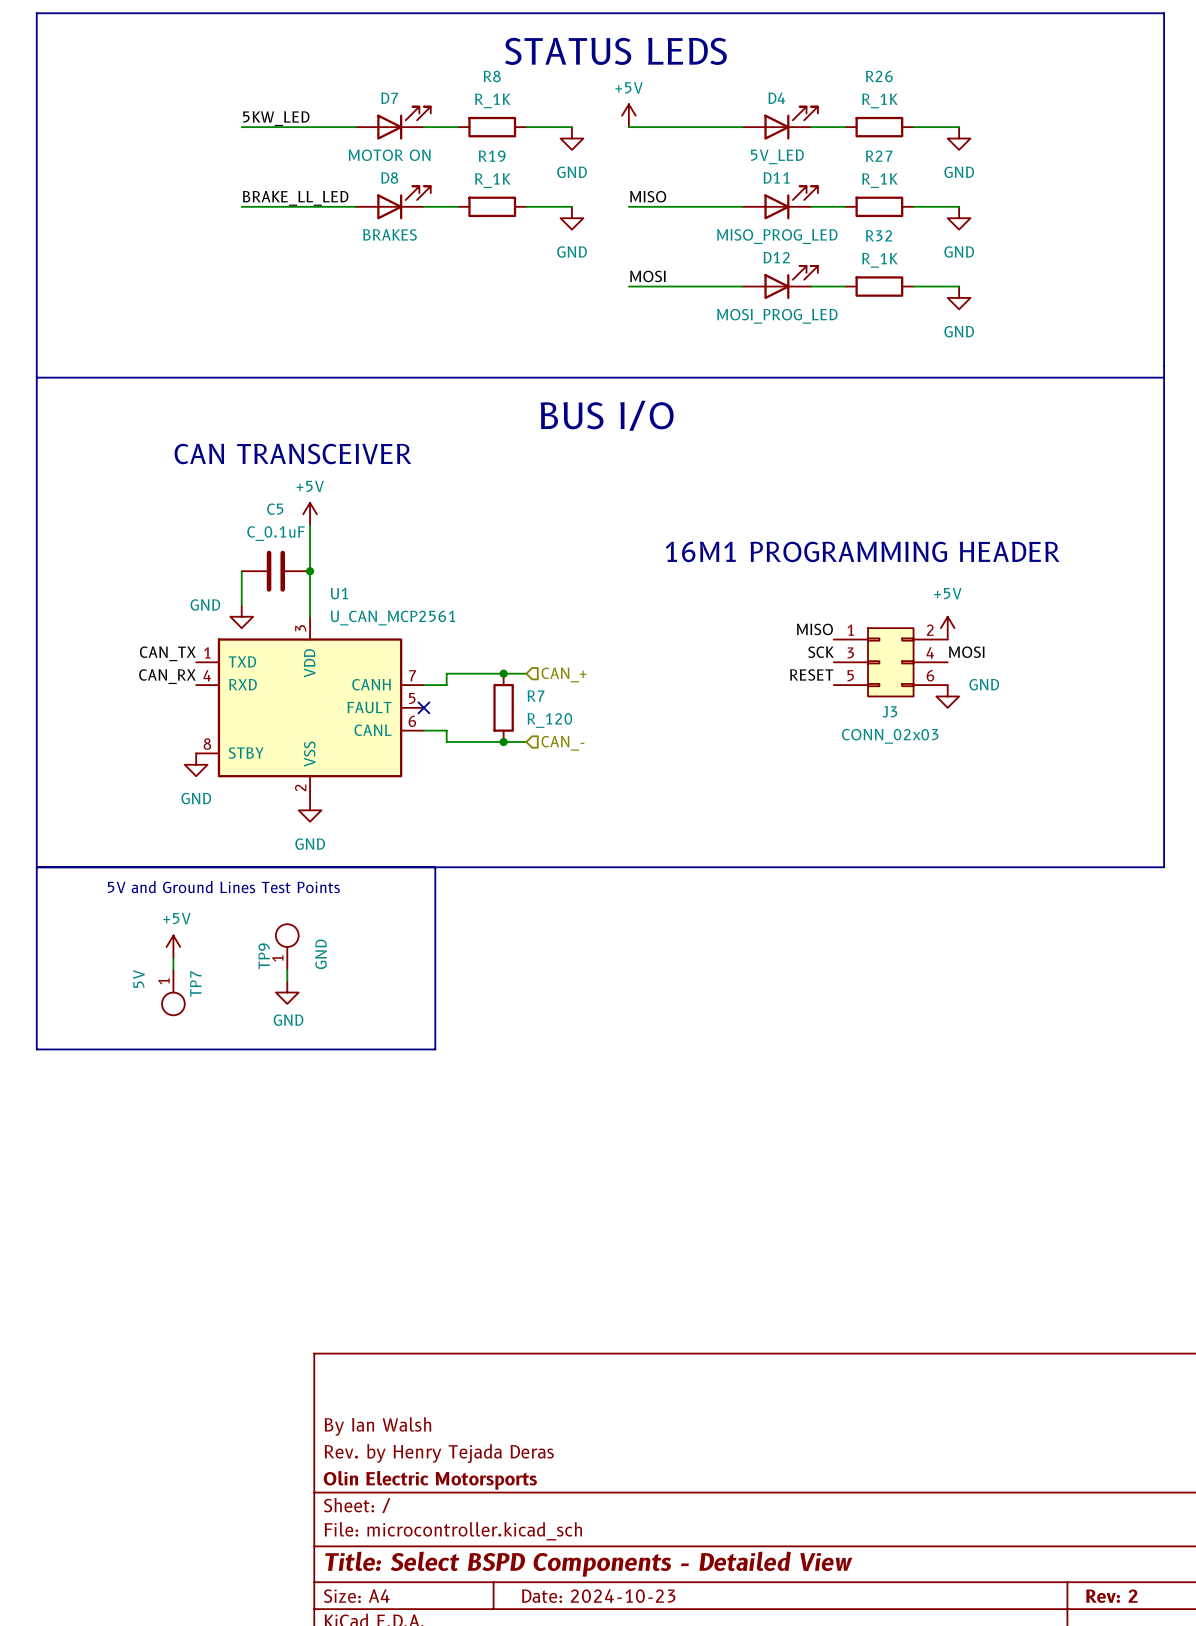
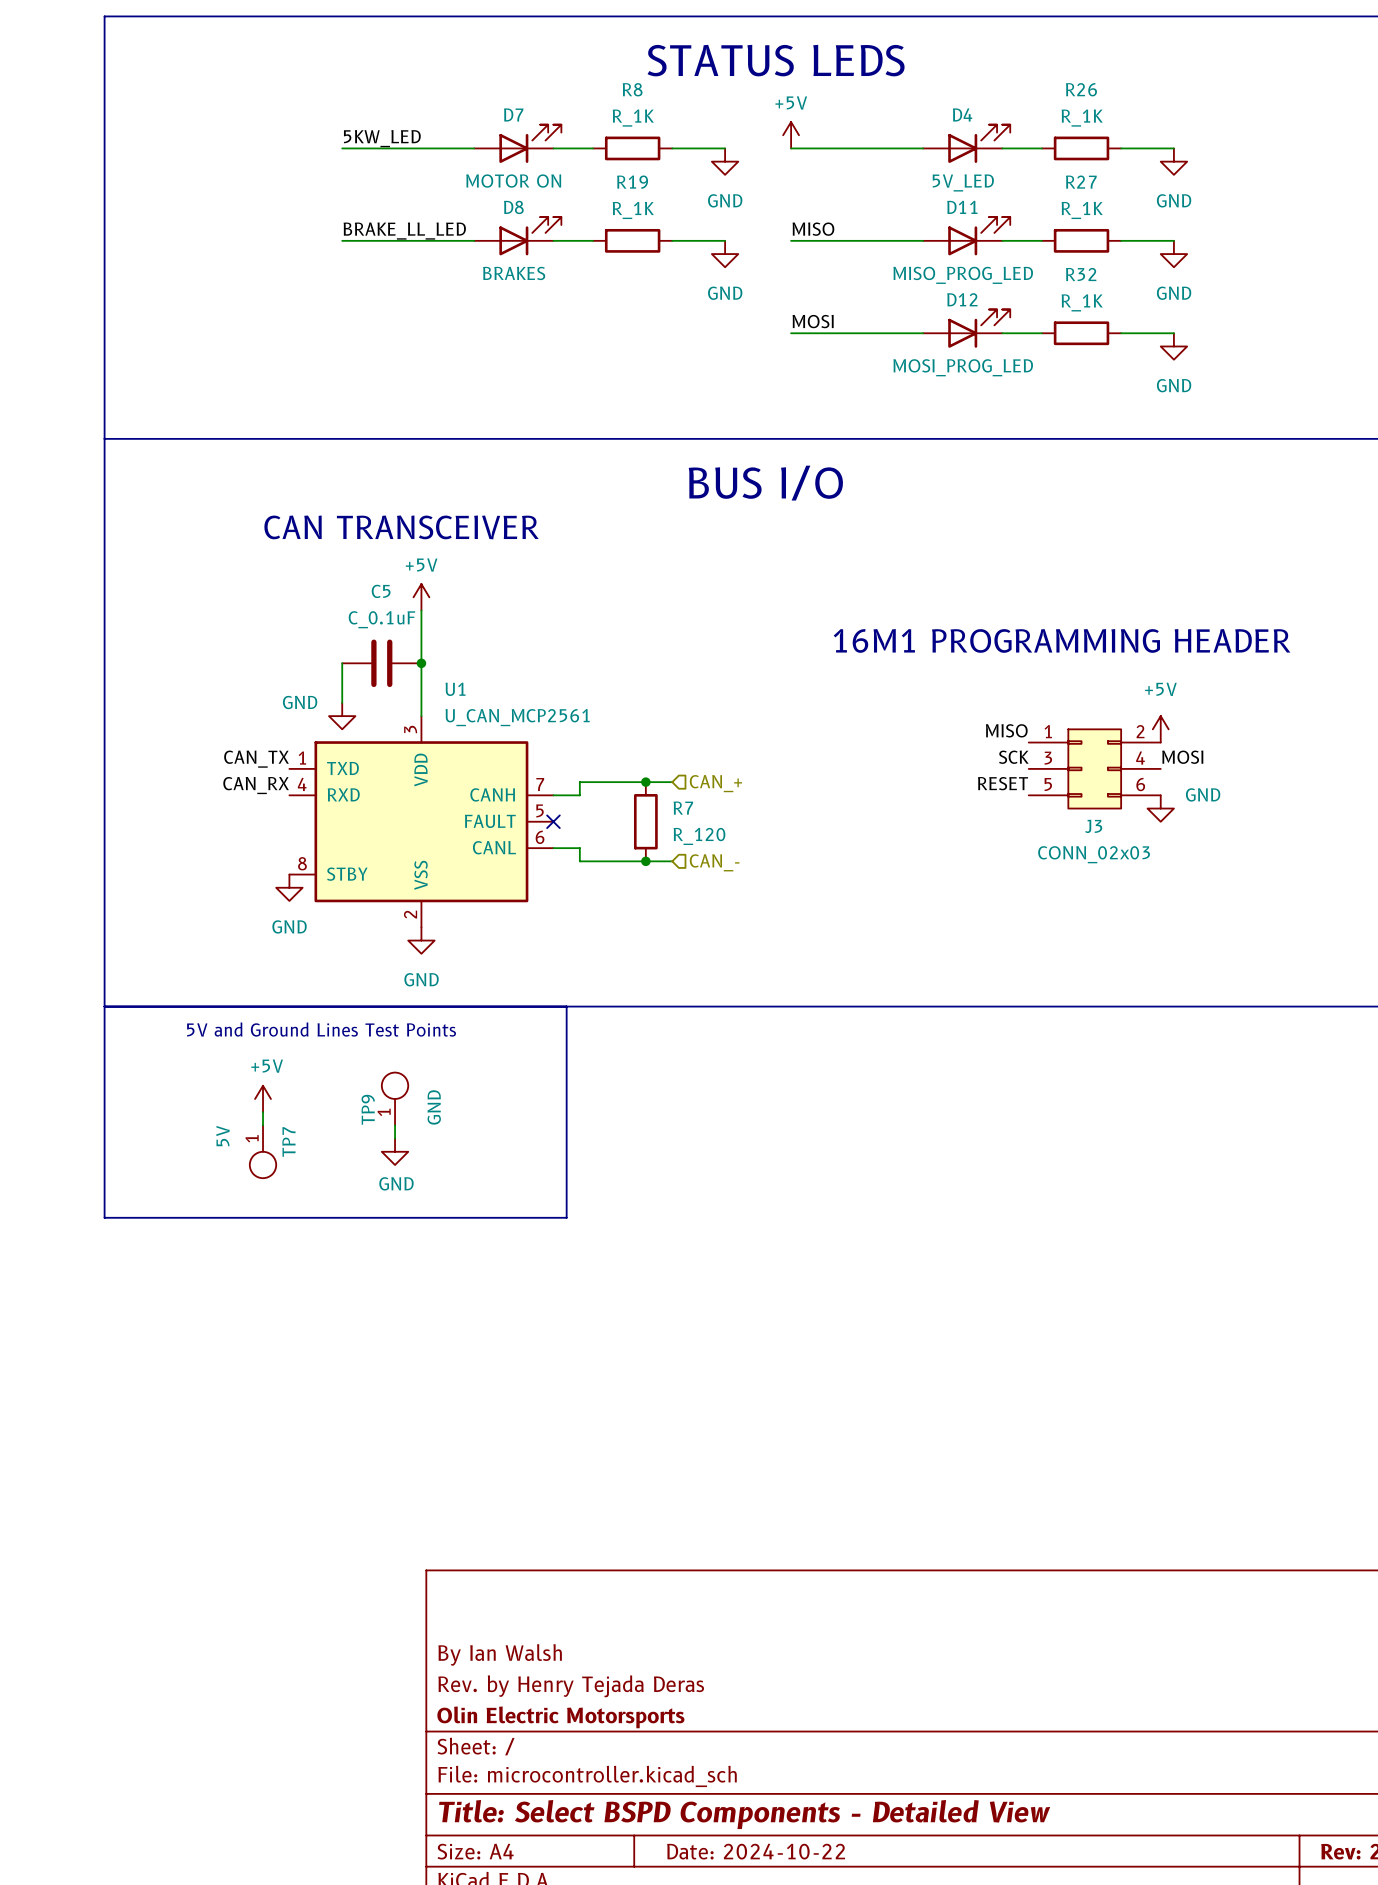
title block: Date: 2024-10-23 (598, 1596) -> Date: 2024-10-22 (756, 1851)

